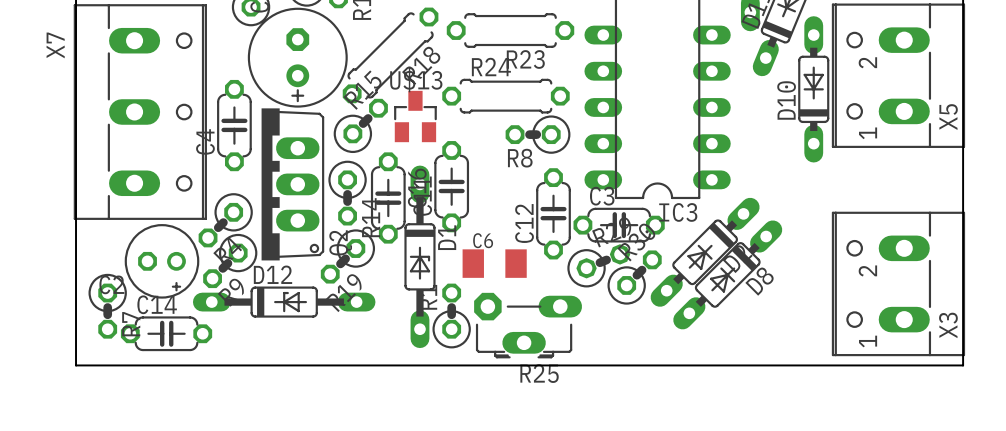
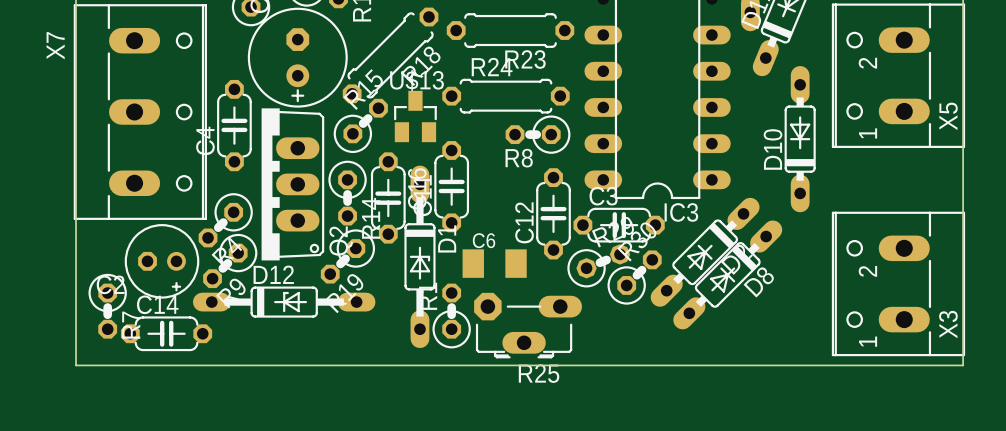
D10 position: (813, 89) -> (800, 139)

